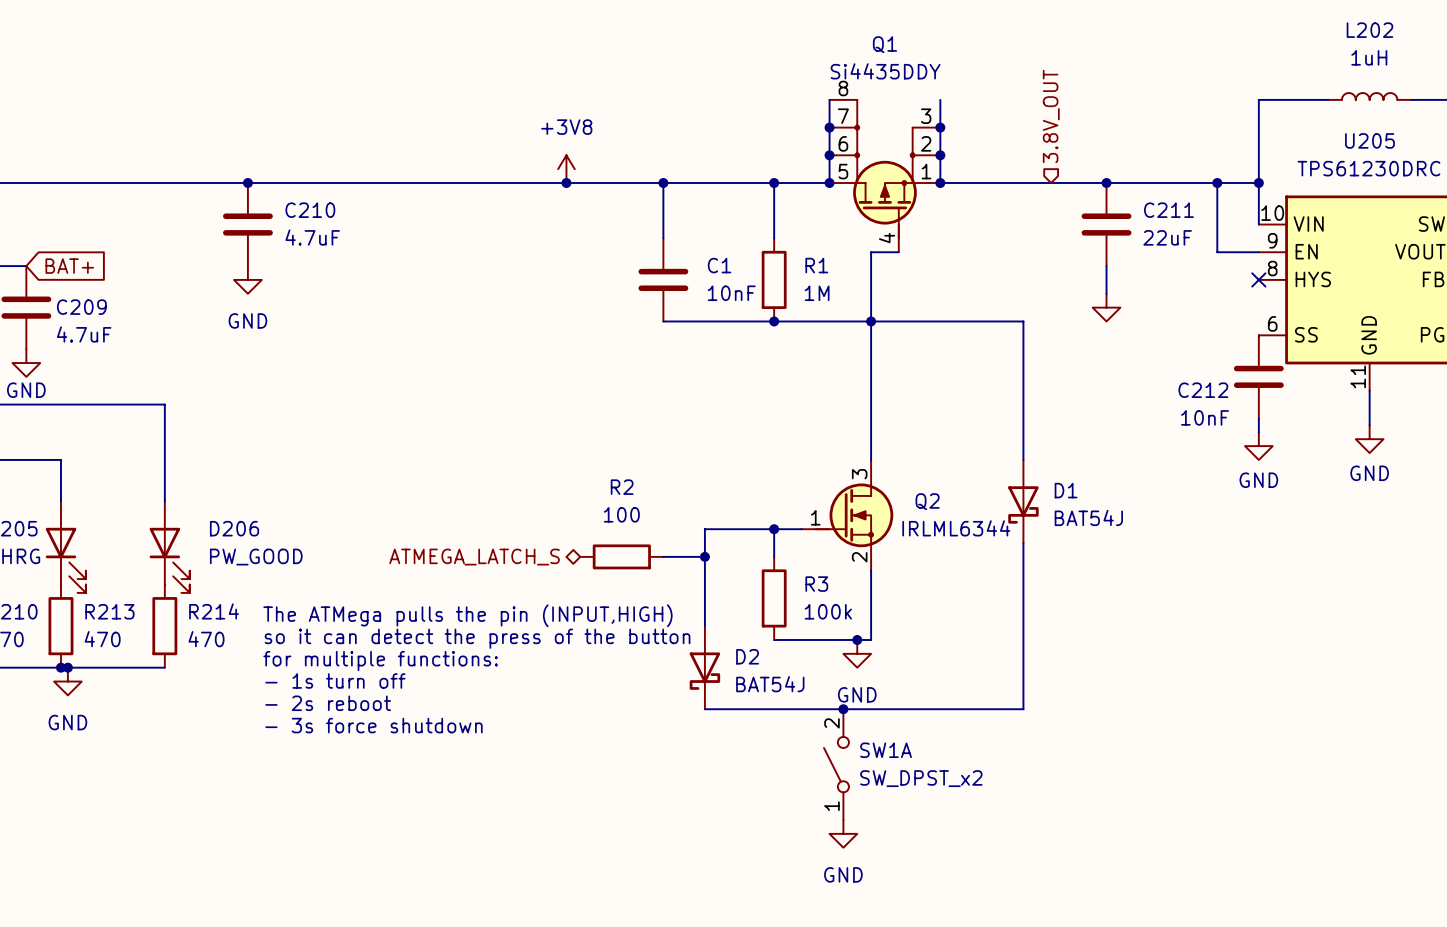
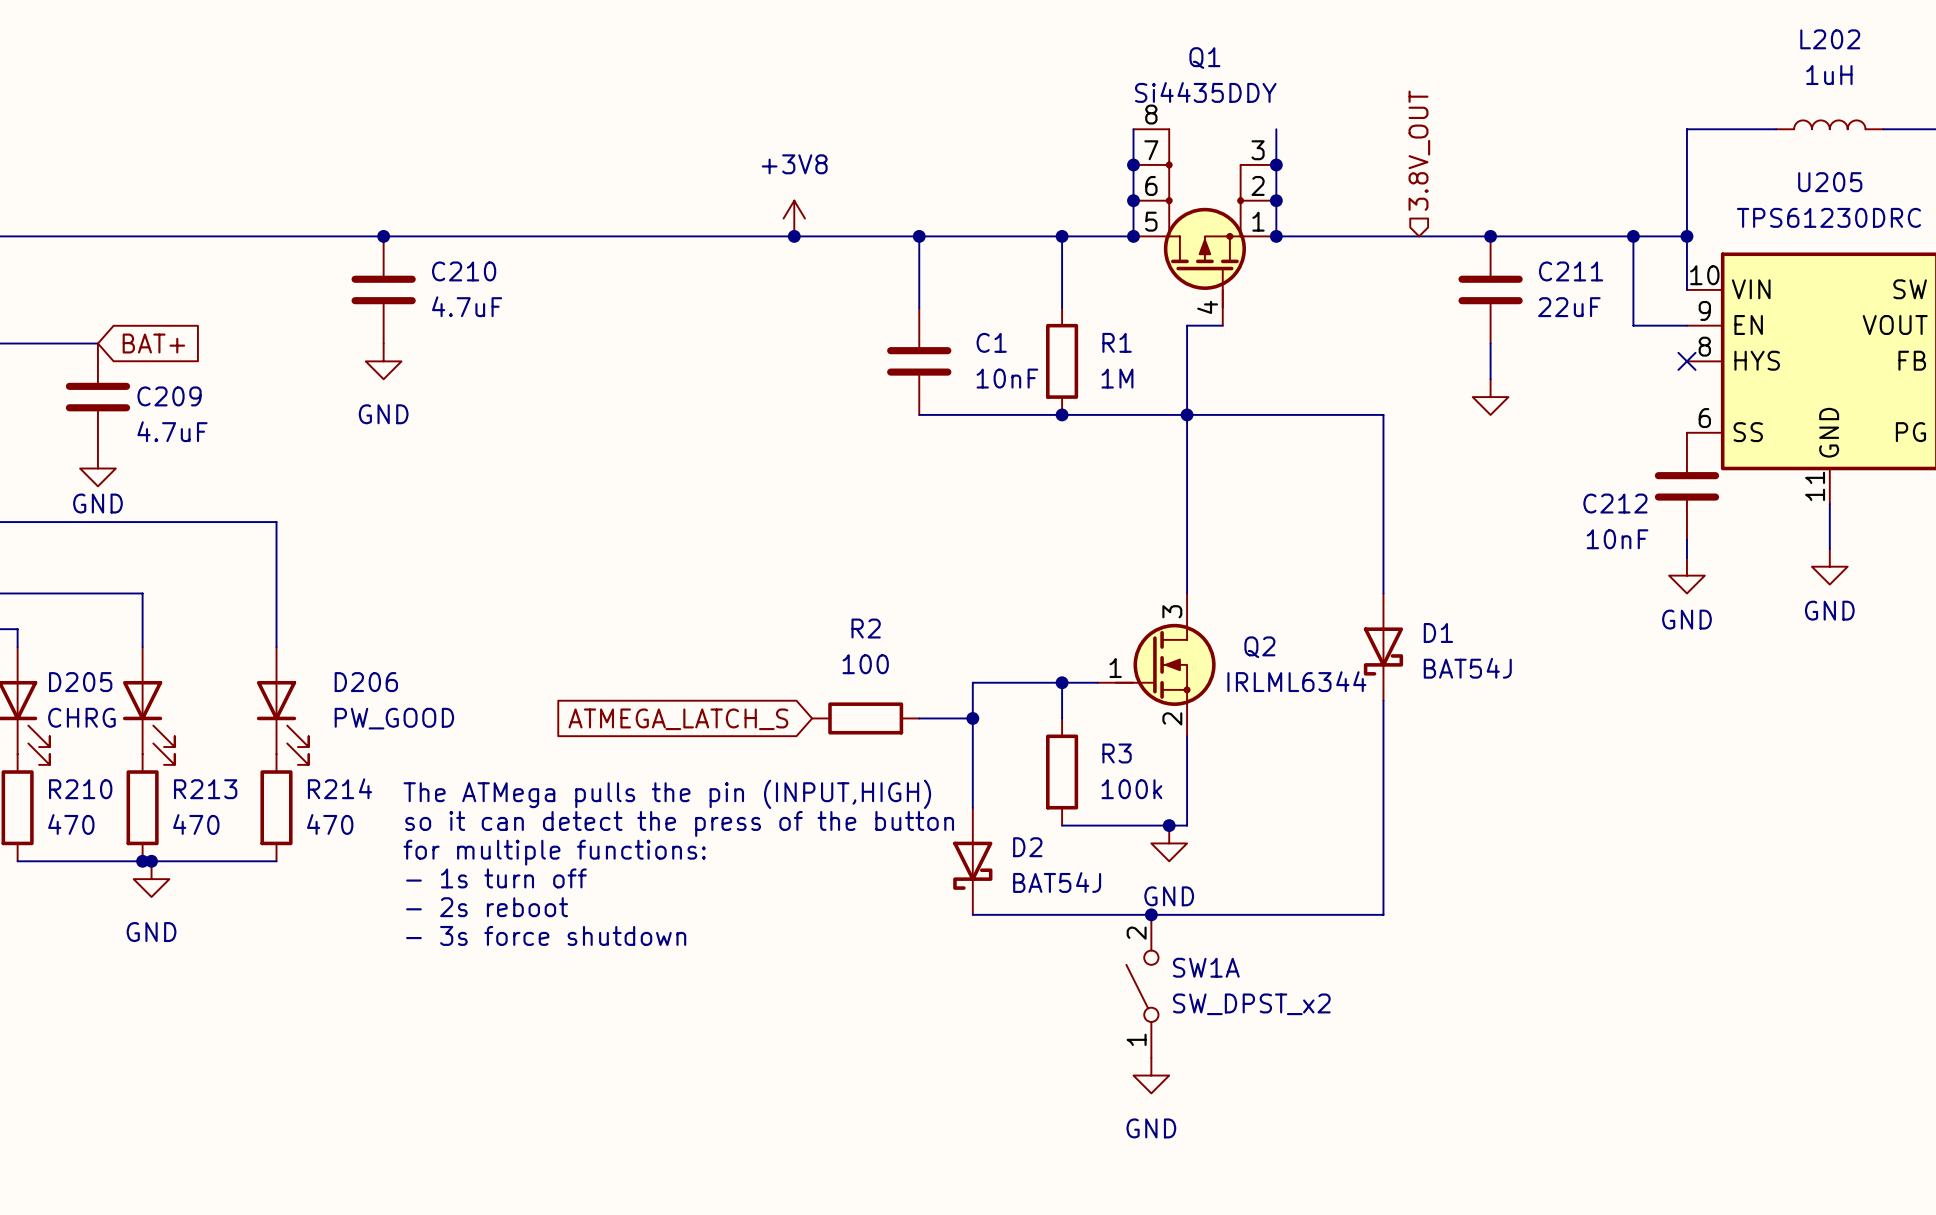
hierarchical label: ATMEGA_LATCH_S (474, 557) -> none
global label: none -> ATMEGA_LATCH_S (678, 719)

